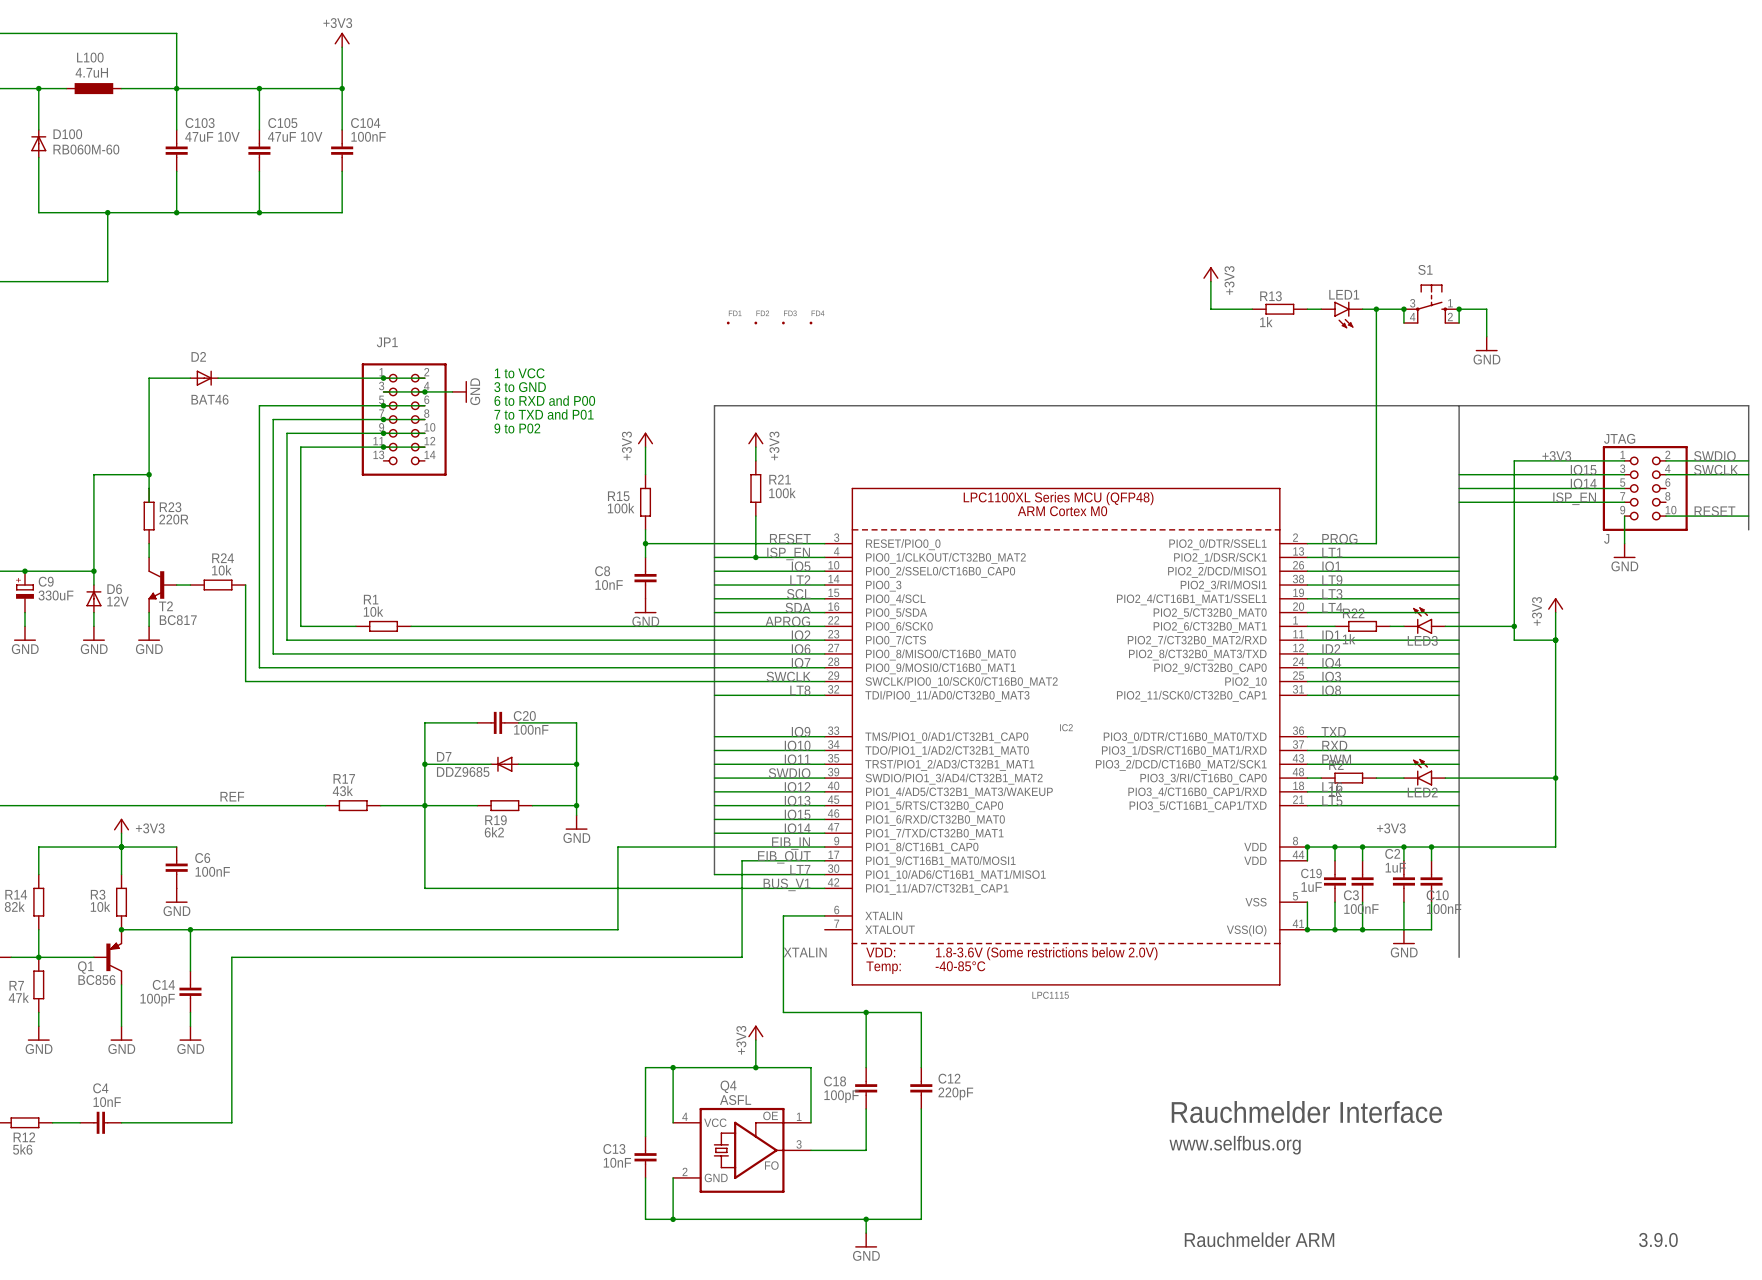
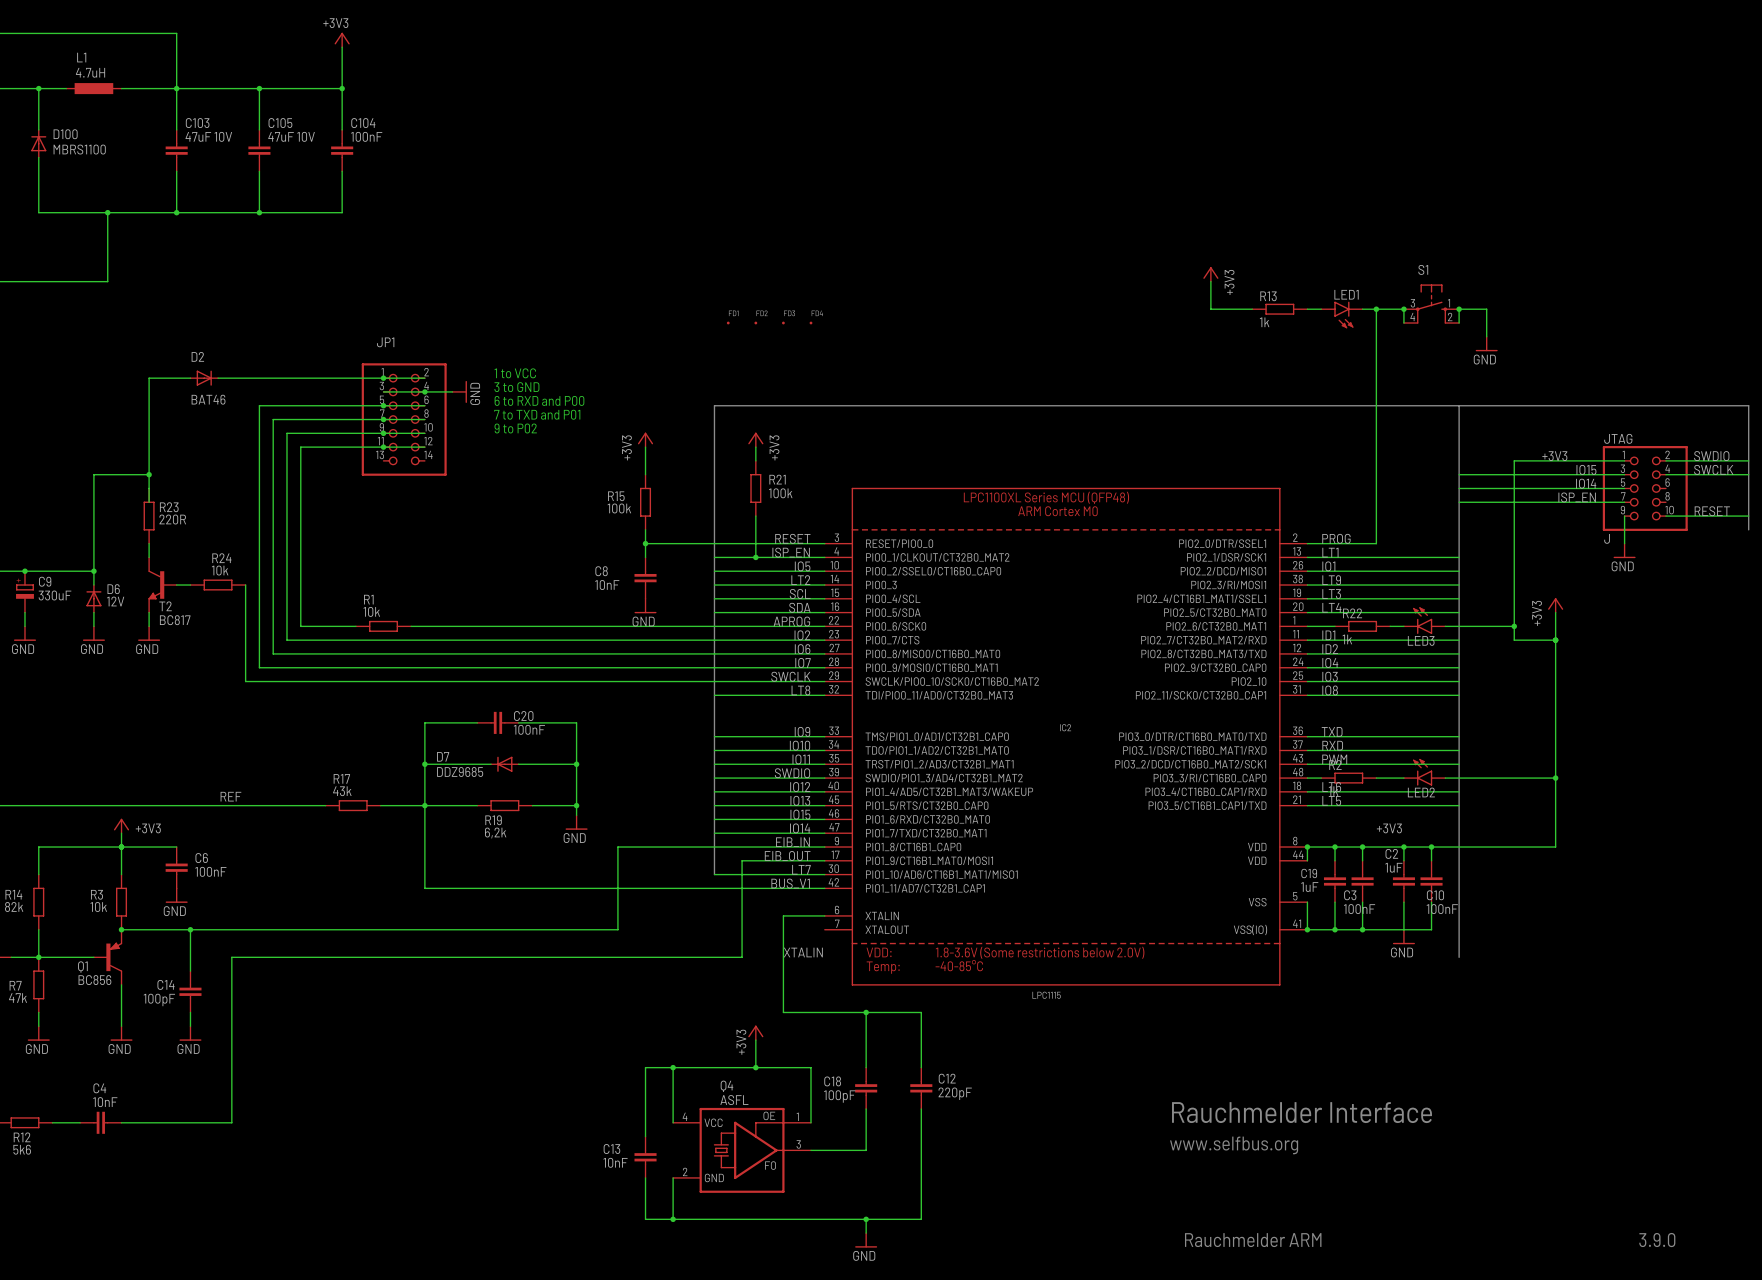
L100 name: L100 (90, 57) -> L1 (81, 57)
D100 value: RB060M-60 (86, 149) -> MBRS1100 (79, 149)
R19 value: 6k2 (494, 832) -> 6,2k (495, 833)

